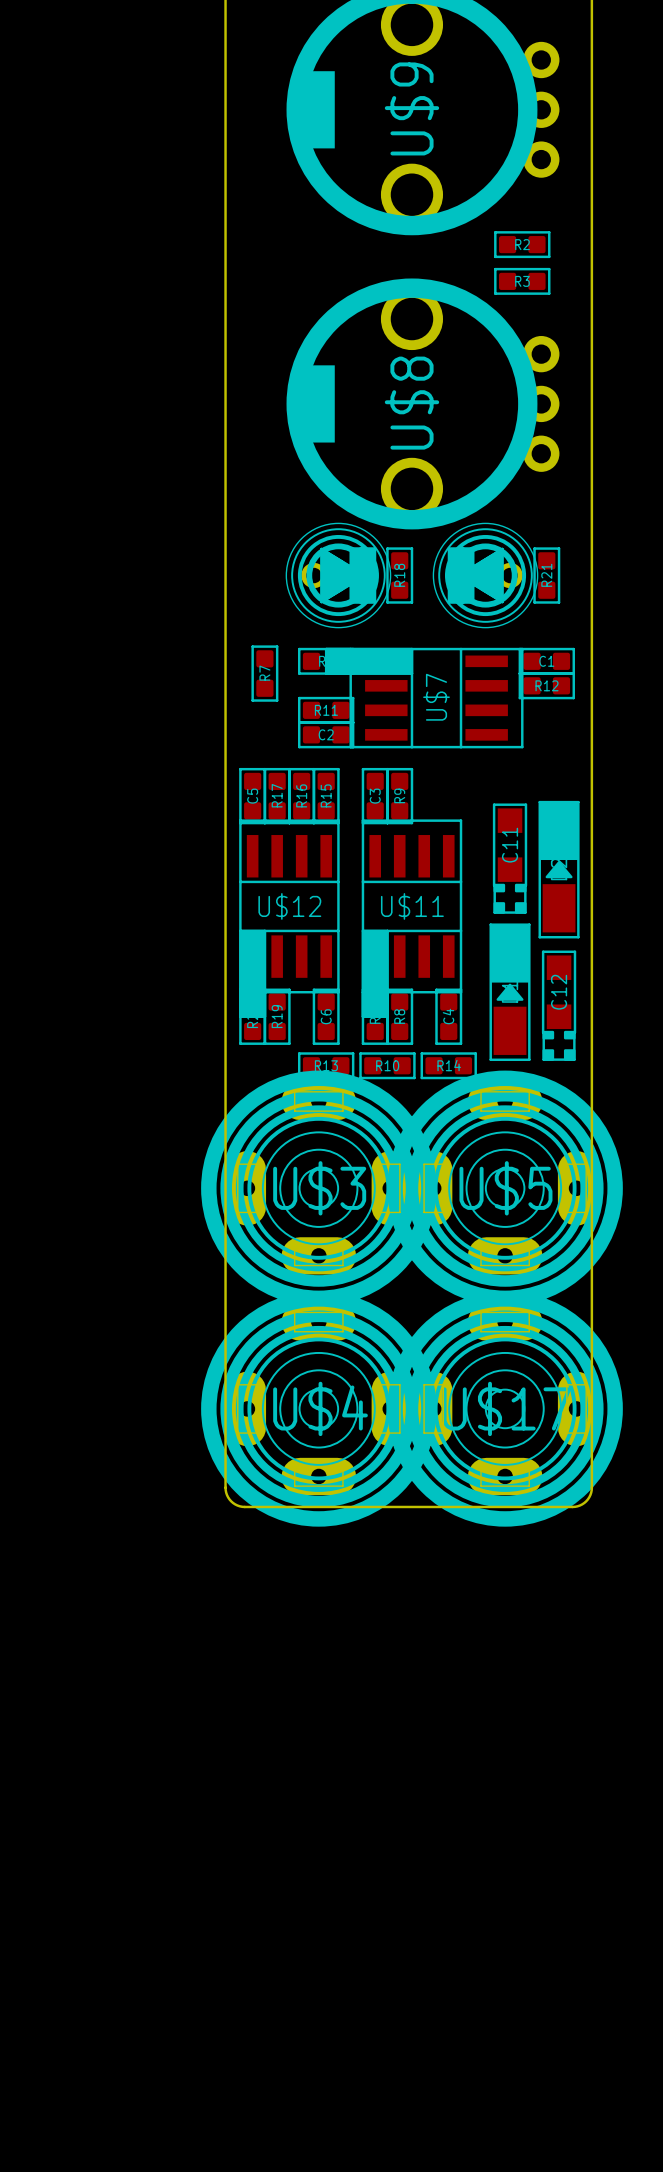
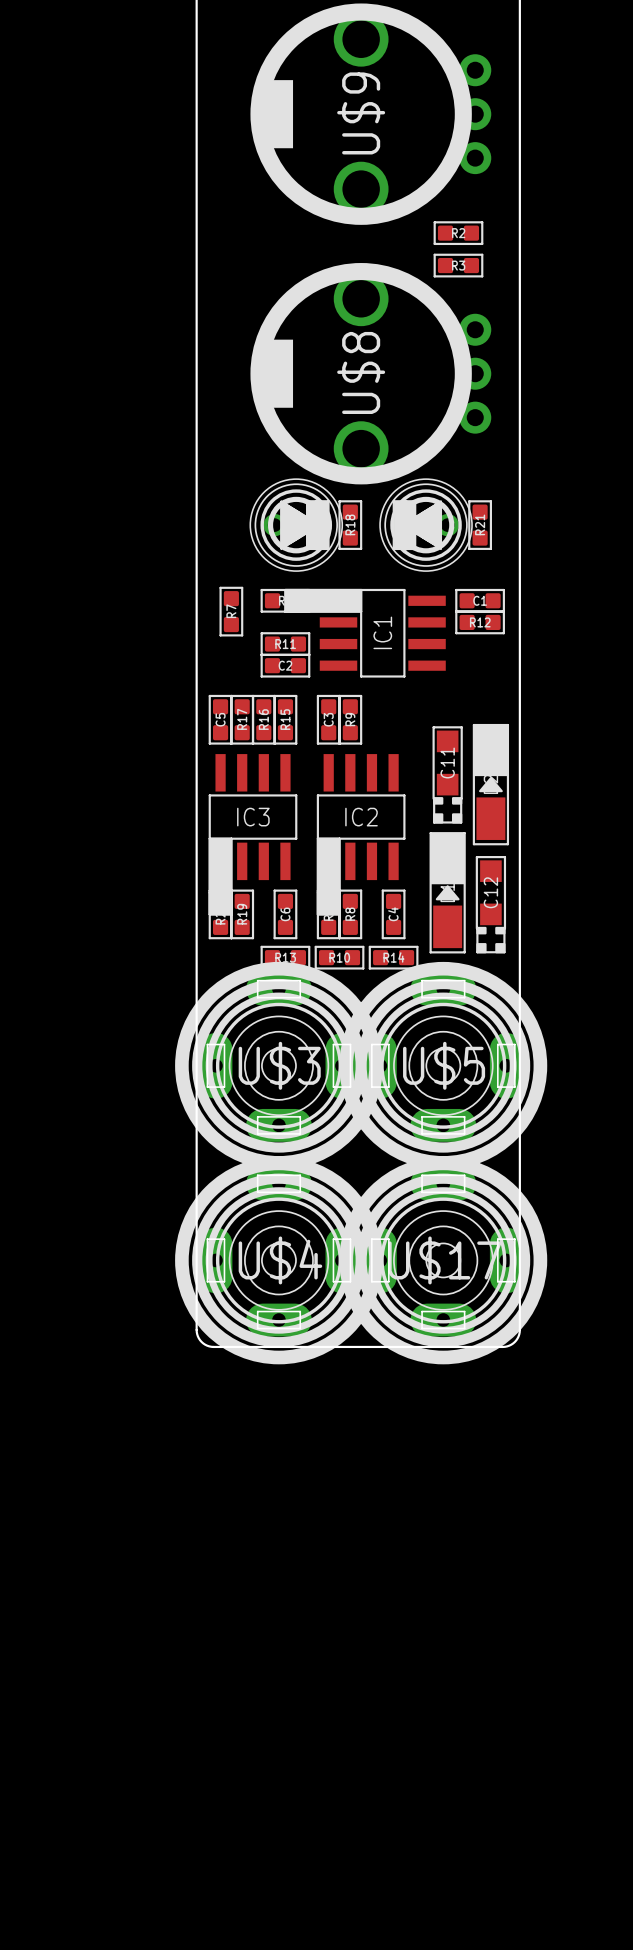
IC1: none -> (365, 633)
U$7: (424, 698) -> none
U$12: (289, 918) -> none
U$11: (411, 918) -> none
IC3: none -> (253, 834)
IC2: none -> (361, 834)

